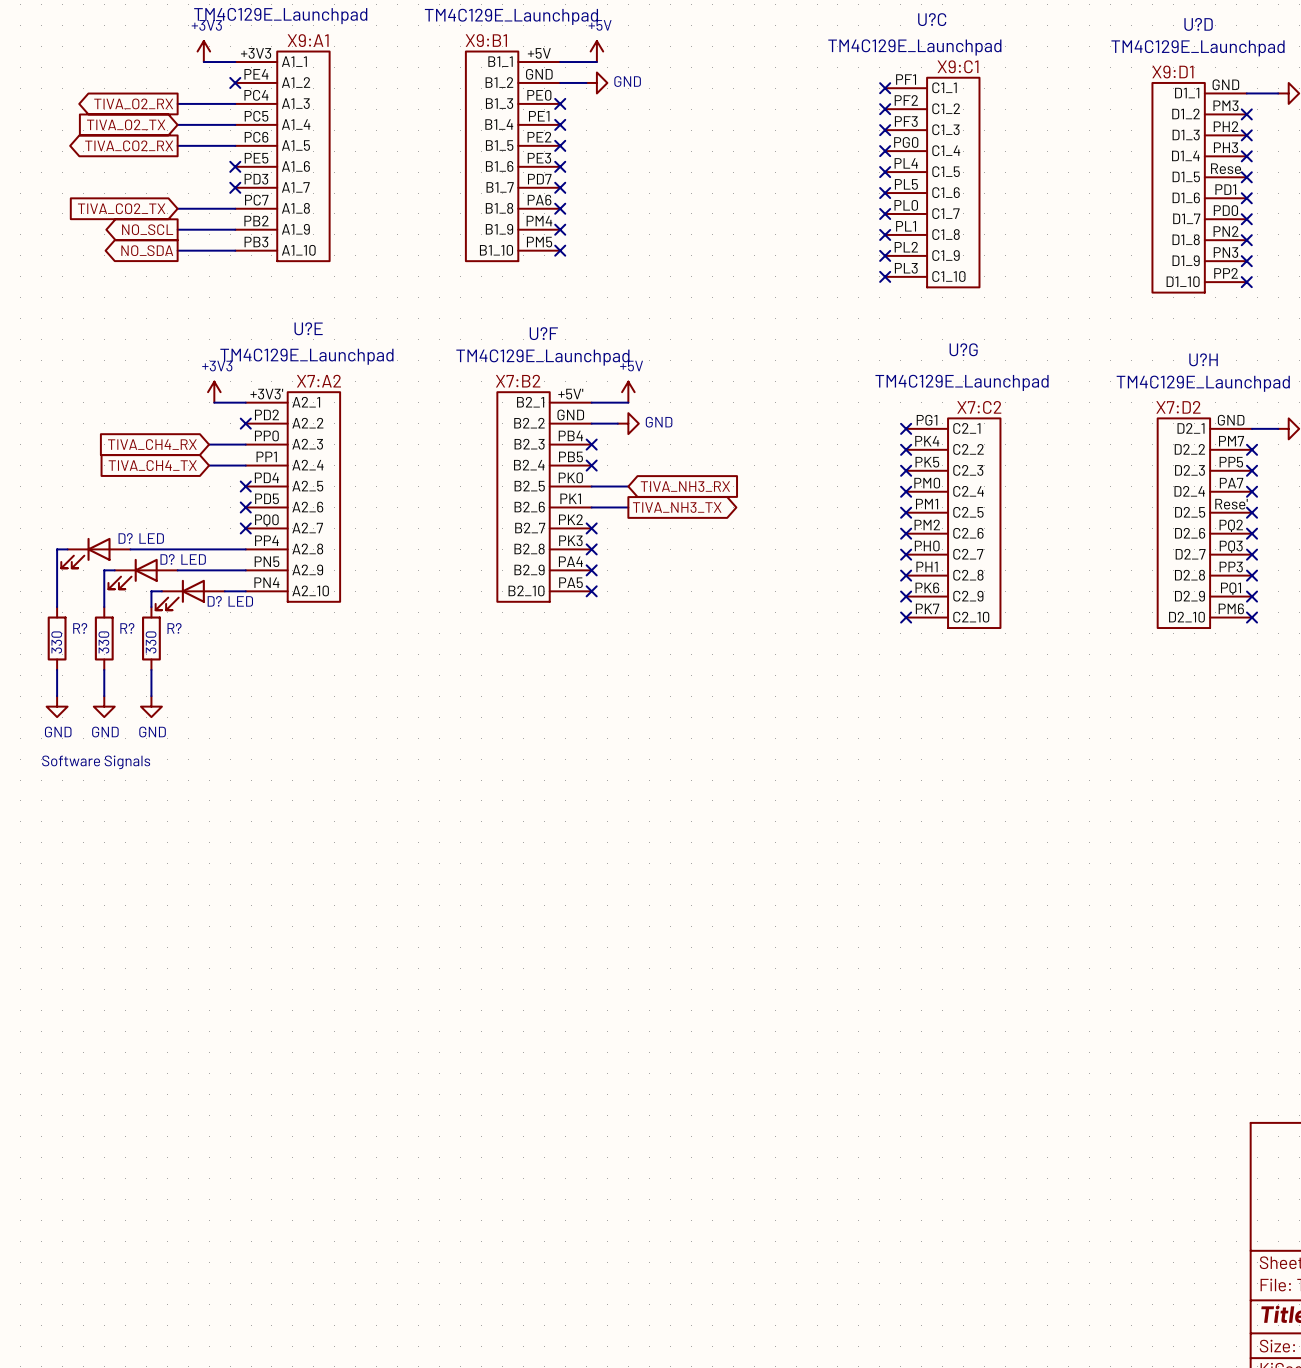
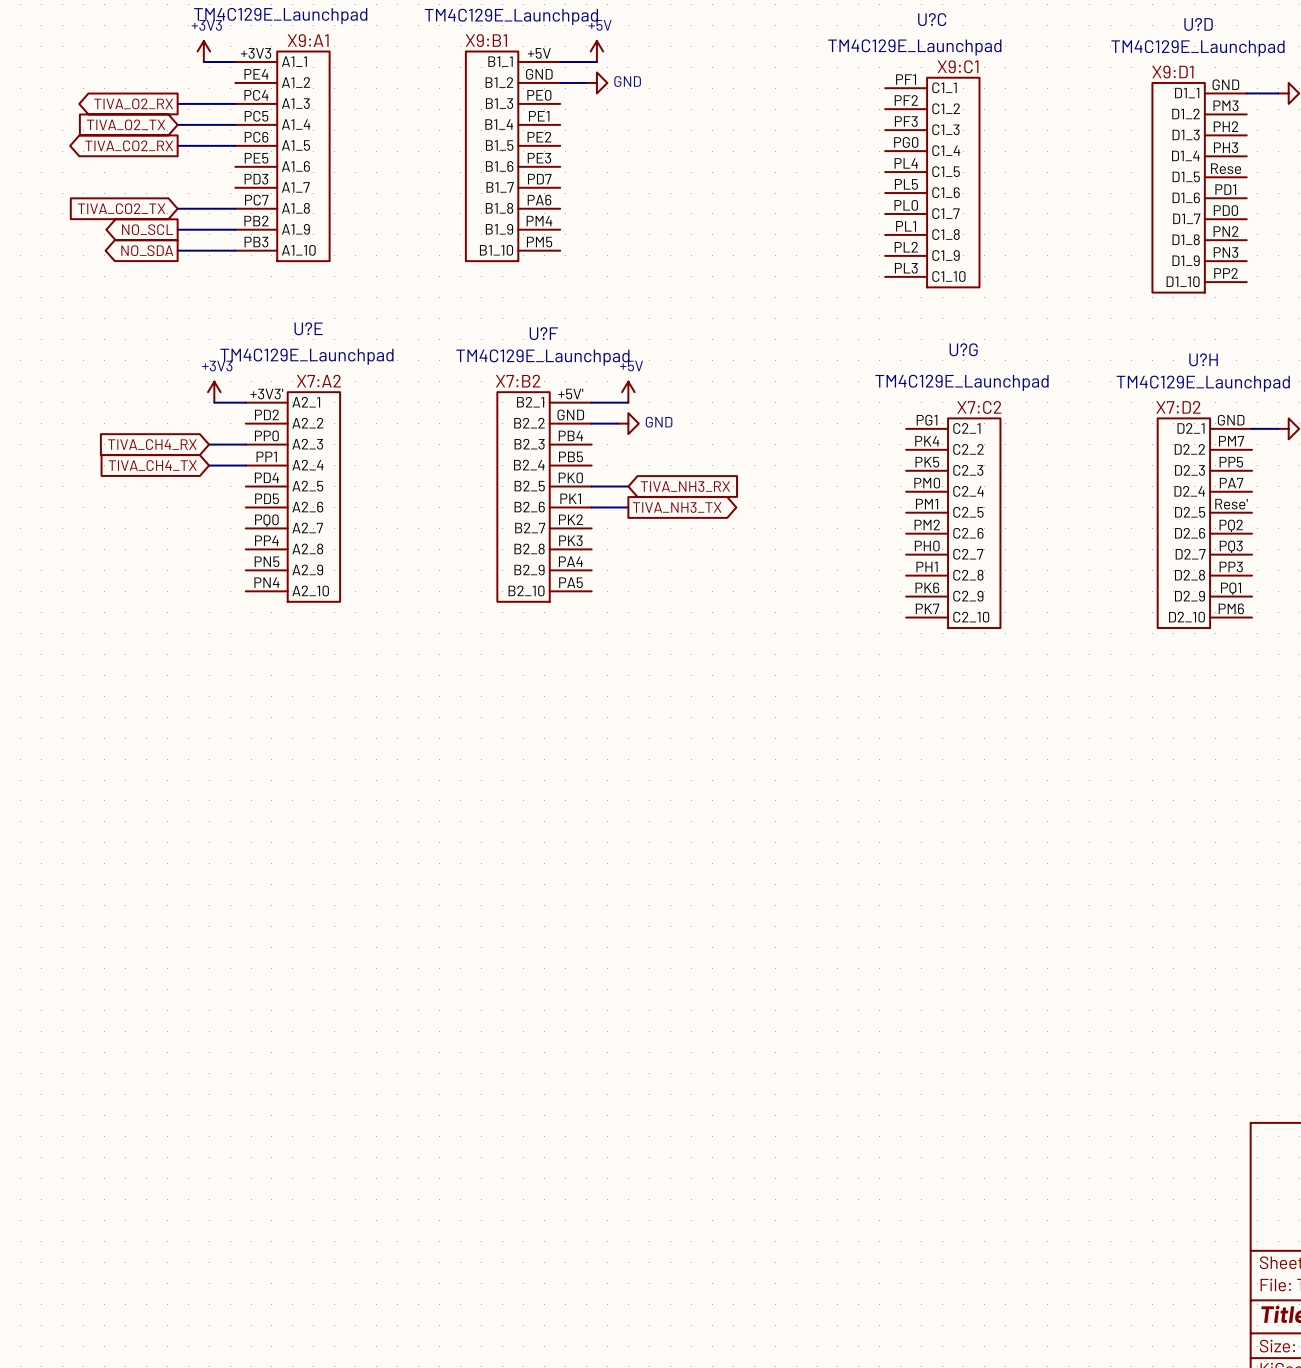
no-connect mark: (235, 82) -> none
no-connect mark: (885, 88) -> none
no-connect mark: (560, 103) -> none
no-connect mark: (885, 109) -> none
no-connect mark: (1246, 114) -> none
no-connect mark: (560, 124) -> none
no-connect mark: (885, 130) -> none
no-connect mark: (1246, 135) -> none
no-connect mark: (560, 145) -> none
no-connect mark: (885, 151) -> none
no-connect mark: (1246, 156) -> none
no-connect mark: (235, 166) -> none
no-connect mark: (560, 166) -> none
no-connect mark: (885, 172) -> none
no-connect mark: (1246, 177) -> none
no-connect mark: (235, 187) -> none
no-connect mark: (560, 187) -> none
no-connect mark: (885, 193) -> none
no-connect mark: (1246, 198) -> none
no-connect mark: (560, 208) -> none
no-connect mark: (885, 213) -> none
no-connect mark: (1246, 219) -> none
no-connect mark: (560, 229) -> none
no-connect mark: (885, 234) -> none
no-connect mark: (1246, 240) -> none
no-connect mark: (560, 250) -> none
no-connect mark: (885, 255) -> none
no-connect mark: (1246, 261) -> none
no-connect mark: (885, 276) -> none
no-connect mark: (1246, 282) -> none
no-connect mark: (245, 423) -> none
no-connect mark: (906, 428) -> none
no-connect mark: (591, 444) -> none
no-connect mark: (906, 449) -> none
no-connect mark: (1252, 449) -> none
no-connect mark: (591, 465) -> none
no-connect mark: (906, 470) -> none
no-connect mark: (1252, 470) -> none
no-connect mark: (245, 486) -> none
no-connect mark: (906, 491) -> none
no-connect mark: (1252, 491) -> none
no-connect mark: (245, 507) -> none
no-connect mark: (906, 512) -> none
no-connect mark: (1252, 512) -> none
no-connect mark: (245, 528) -> none
no-connect mark: (591, 528) -> none
no-connect mark: (906, 533) -> none
no-connect mark: (1252, 533) -> none
wire: (67, 549) (57, 549) (57, 607) -> none
wire: (130, 549) (245, 549) -> none
no-connect mark: (591, 549) -> none
D?: LED (95, 553) -> none
no-connect mark: (906, 554) -> none
no-connect mark: (1252, 554) -> none
wire: (114, 570) (104, 570) (104, 607) -> none
wire: (177, 570) (245, 570) -> none
no-connect mark: (591, 570) -> none
D?: LED (143, 574) -> none
no-connect mark: (906, 575) -> none
no-connect mark: (1252, 575) -> none
wire: (161, 591) (151, 591) (151, 607) -> none
wire: (224, 591) (245, 591) -> none
no-connect mark: (591, 591) -> none
D?: LED (190, 595) -> none
no-connect mark: (906, 596) -> none
no-connect mark: (1252, 596) -> none
no-connect mark: (906, 617) -> none
no-connect mark: (1252, 617) -> none
R?: 330 (57, 638) -> none
R?: 330 (104, 638) -> none
R?: 330 (151, 638) -> none
wire: (57, 669) (57, 696) -> none
wire: (104, 669) (104, 696) -> none
wire: (151, 669) (151, 696) -> none
power symbol: GND (57, 706) -> none
power symbol: GND (104, 706) -> none
power symbol: GND (151, 706) -> none
text: Software Signals (96, 762) -> none

